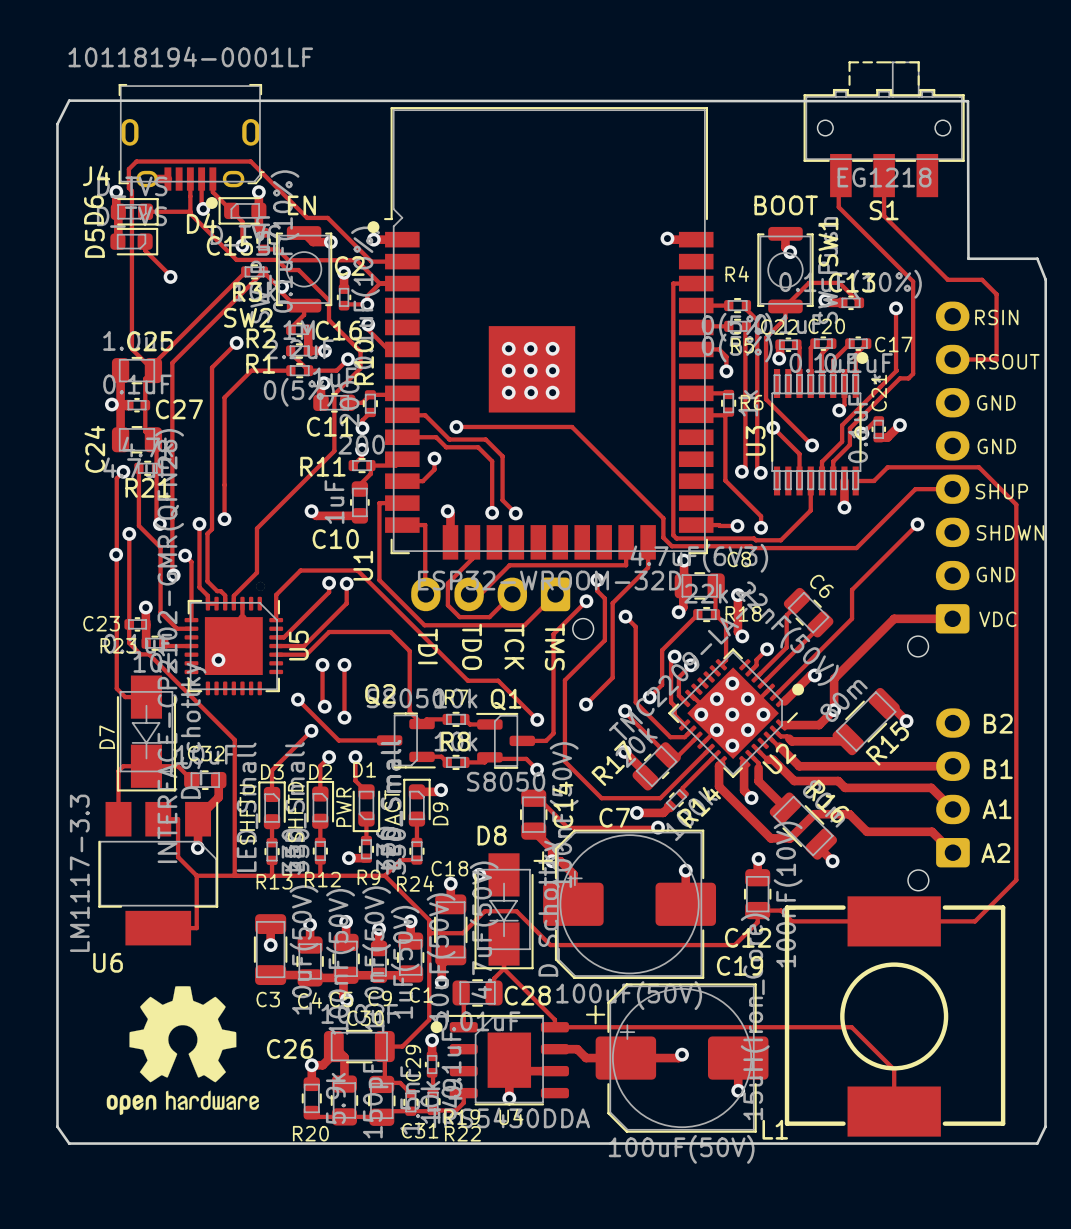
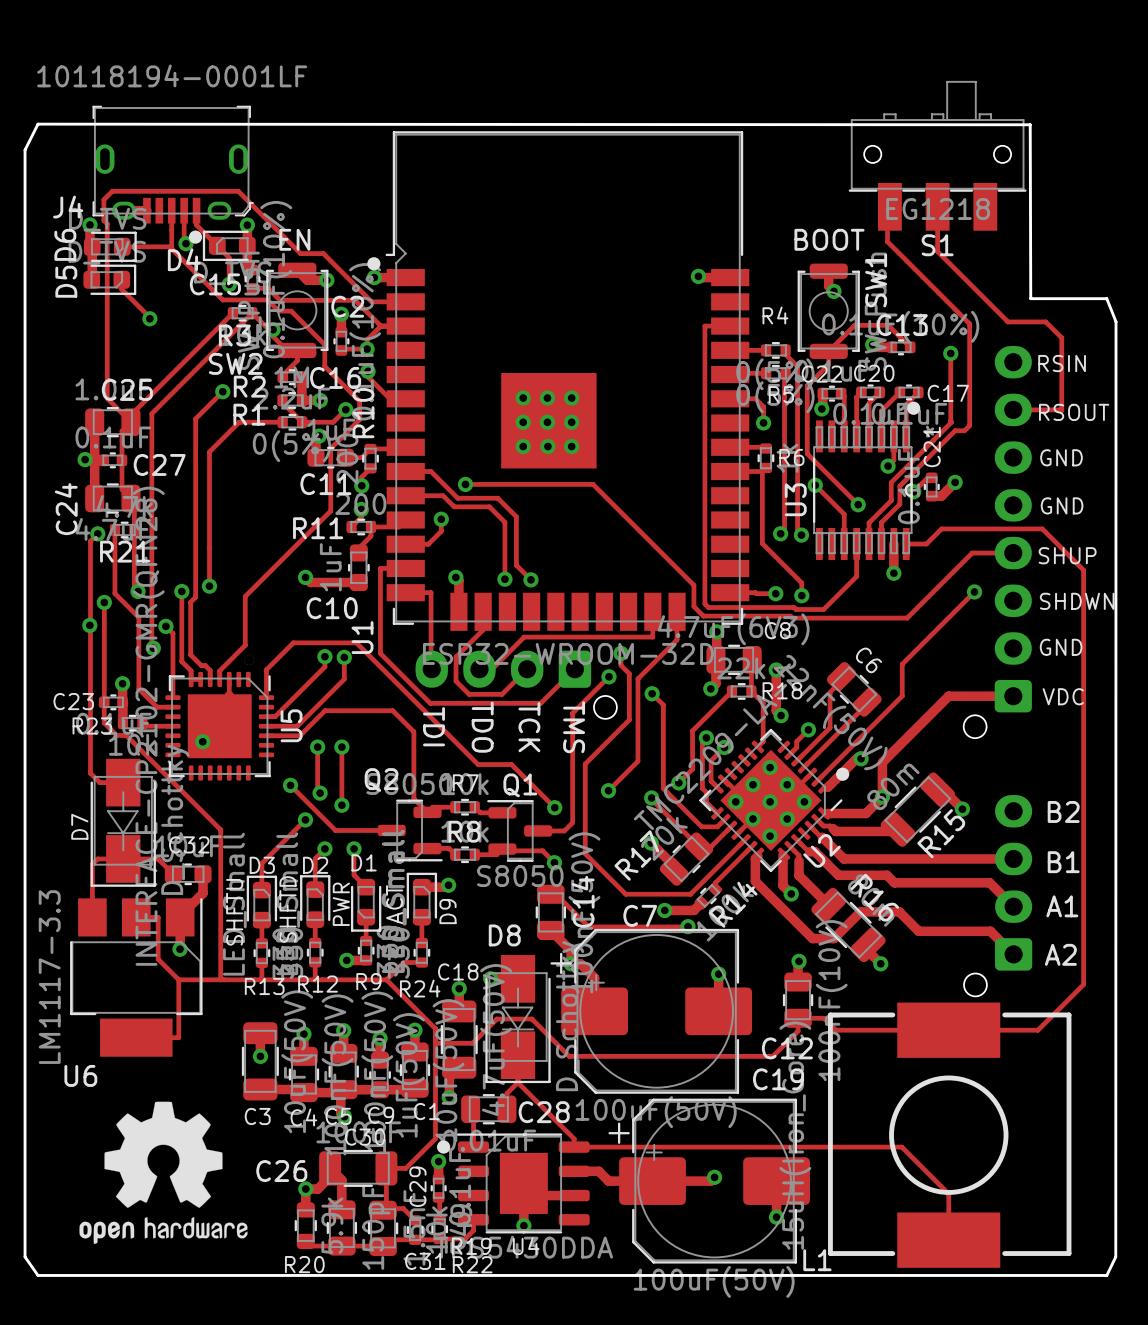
S1 footprint: [803, 61, 965, 198] -> [848, 80, 1027, 231]

